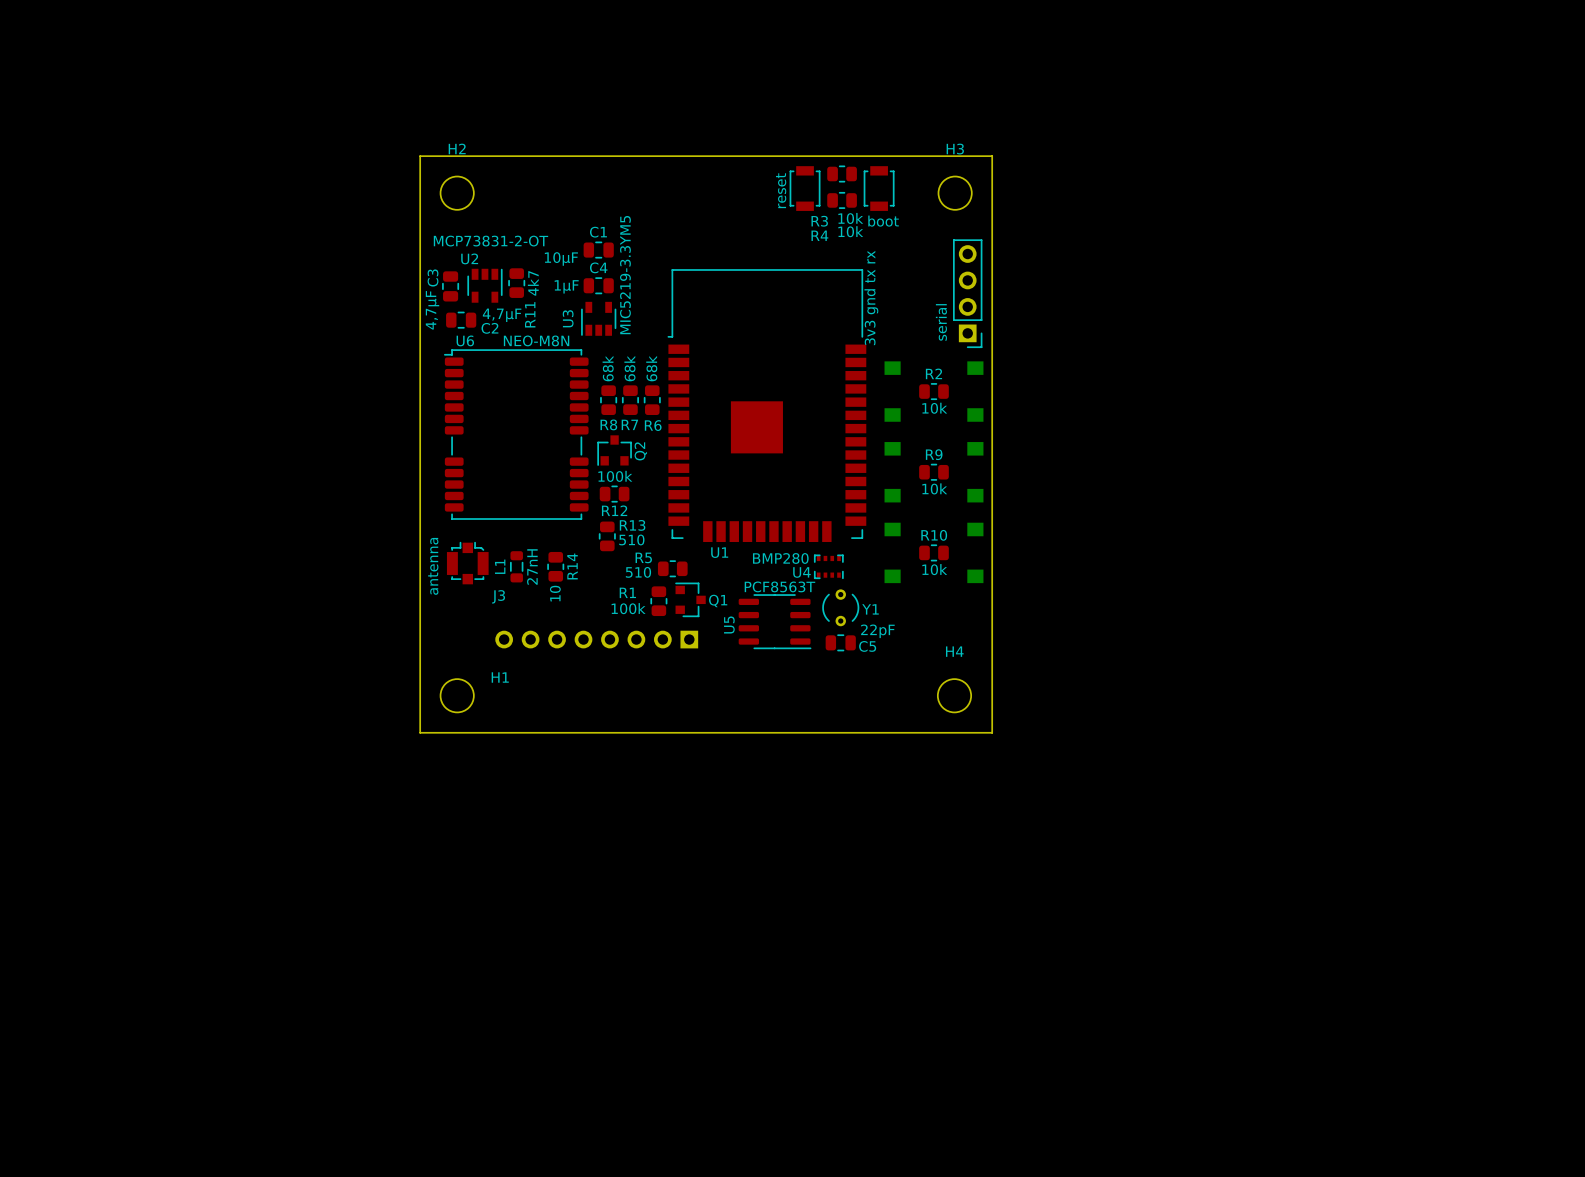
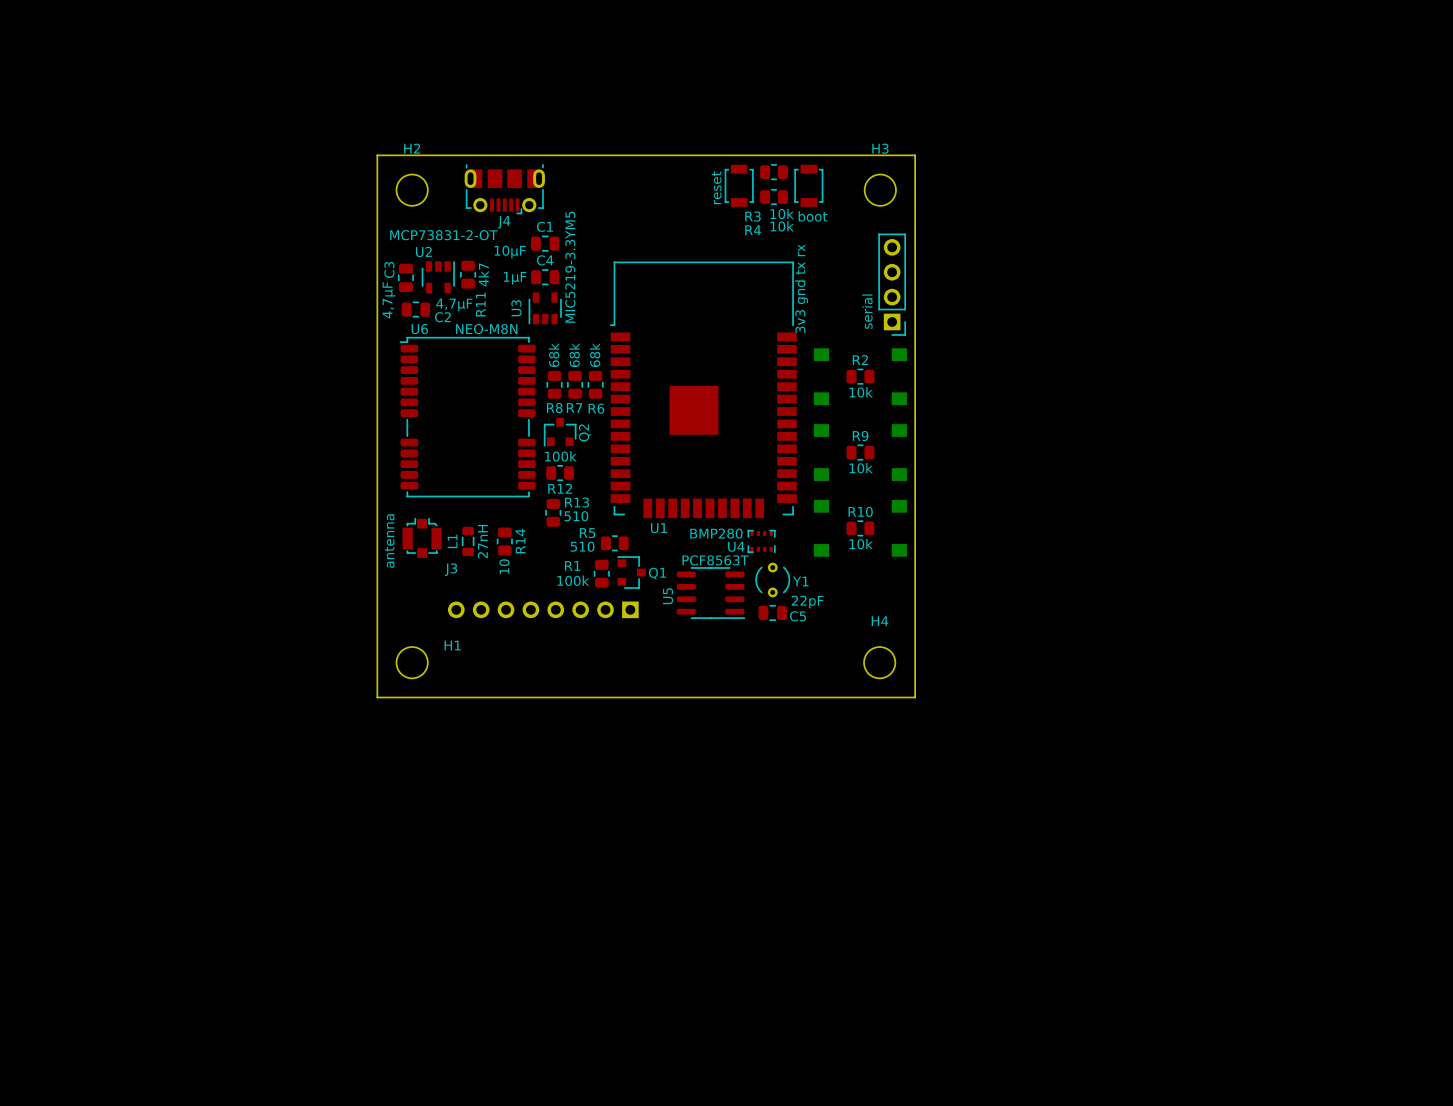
J4: none -> (504, 189)

